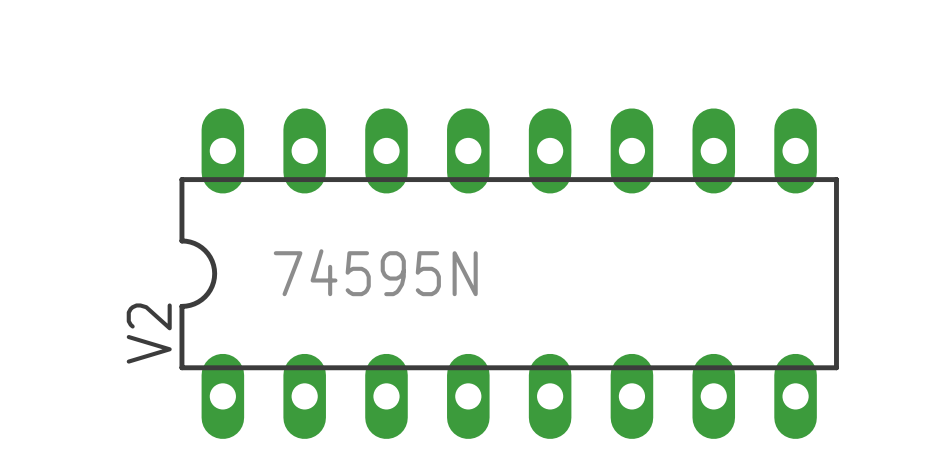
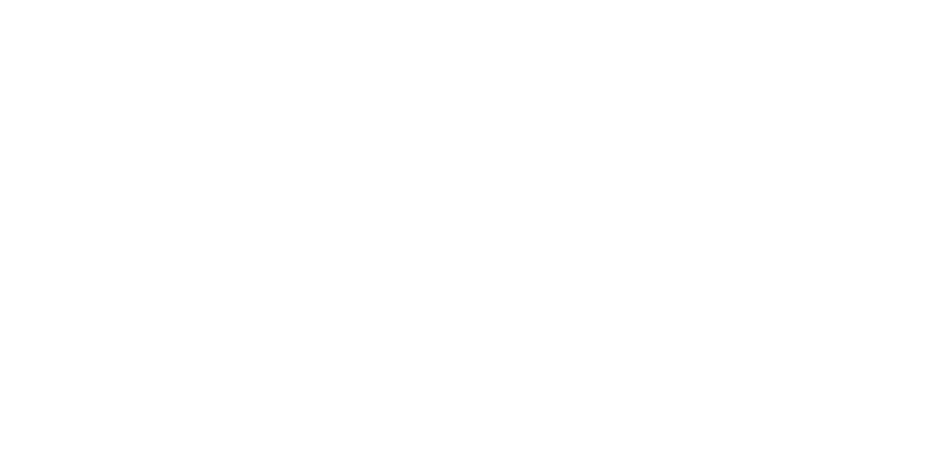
V2: 74595N (509, 273) -> none

